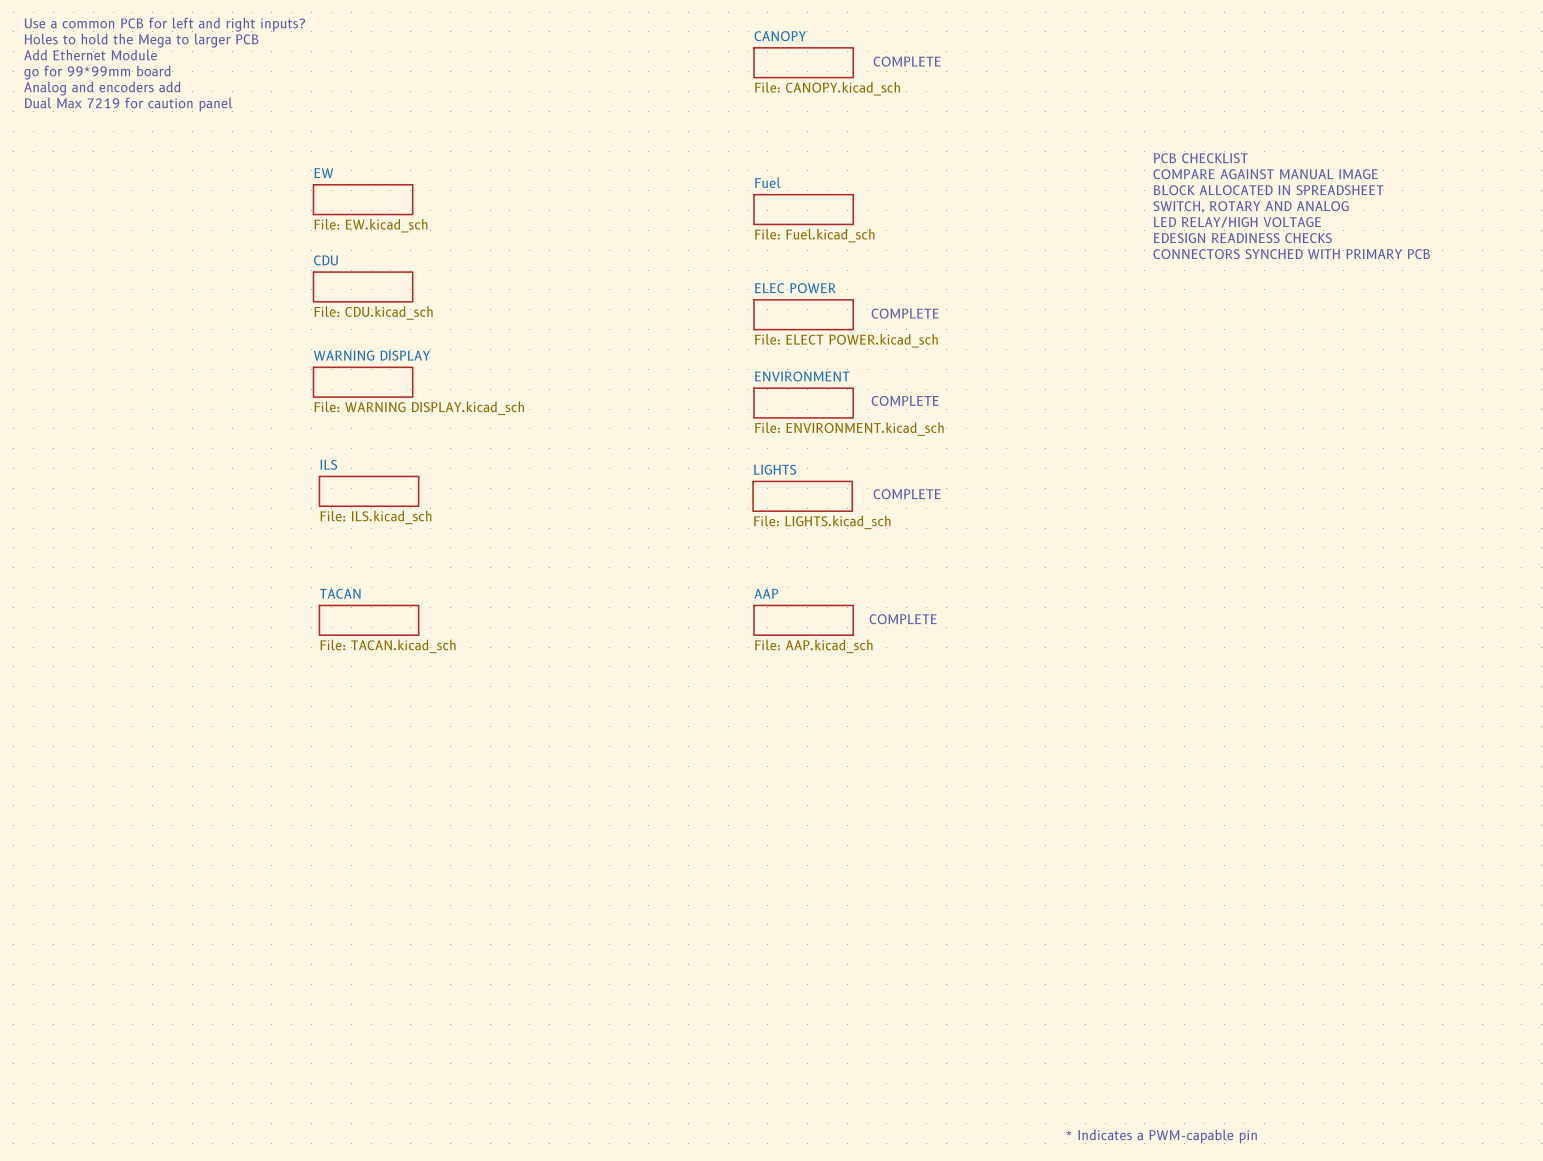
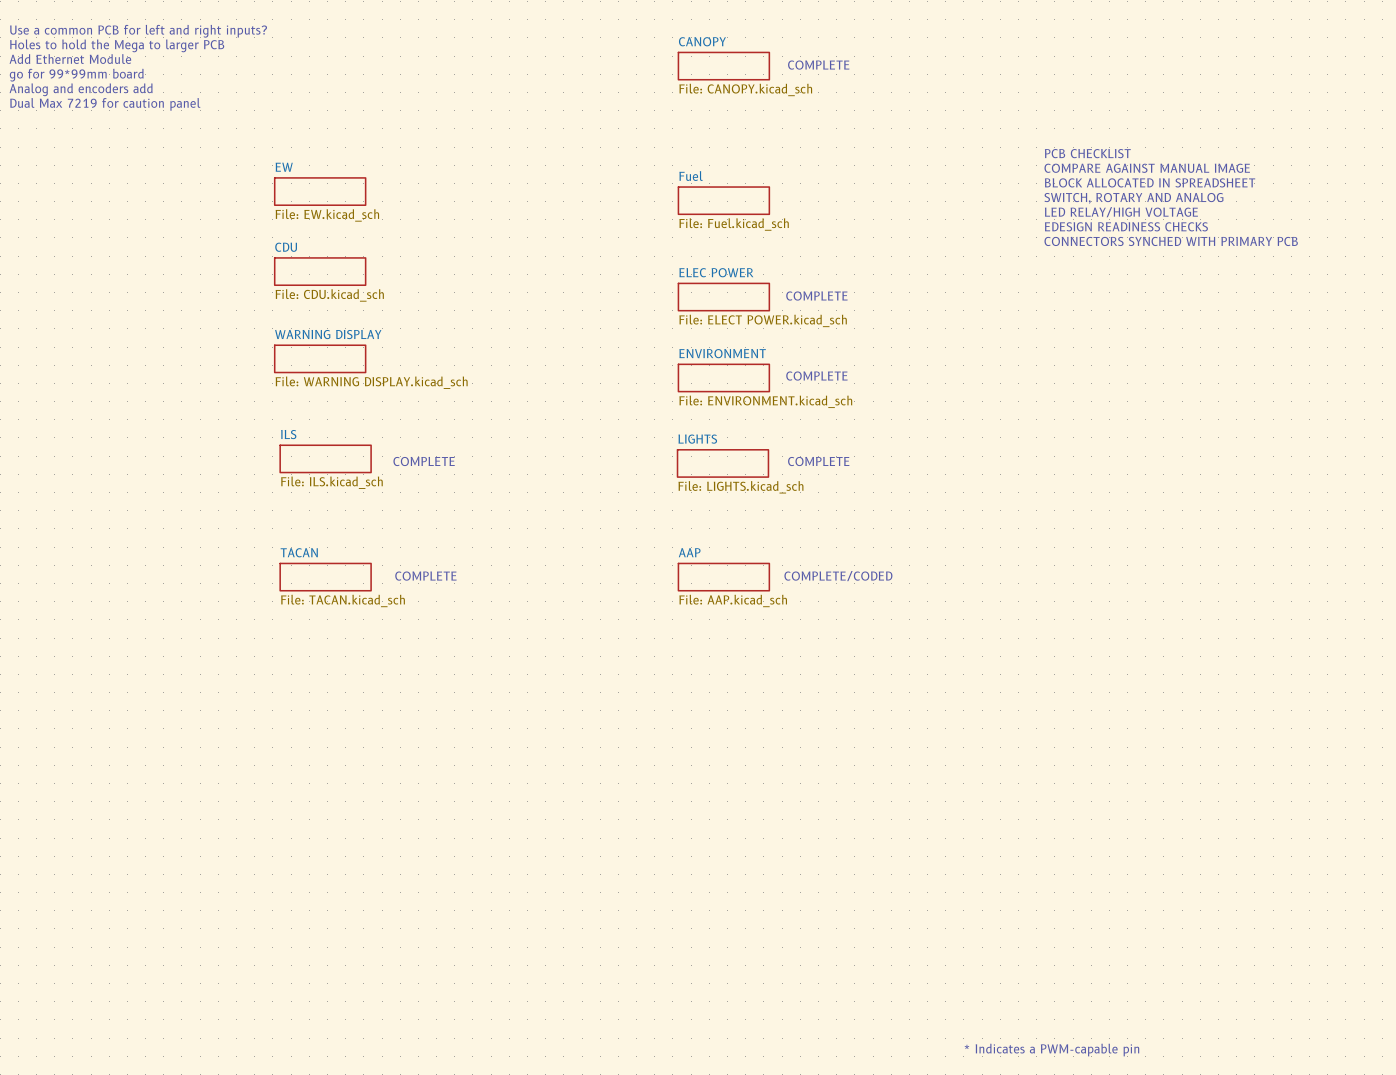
text: none -> COMPLETE (424, 461)
text: none -> COMPLETE (425, 576)
text: COMPLETE (903, 619) -> COMPLETE/CODED (838, 576)

